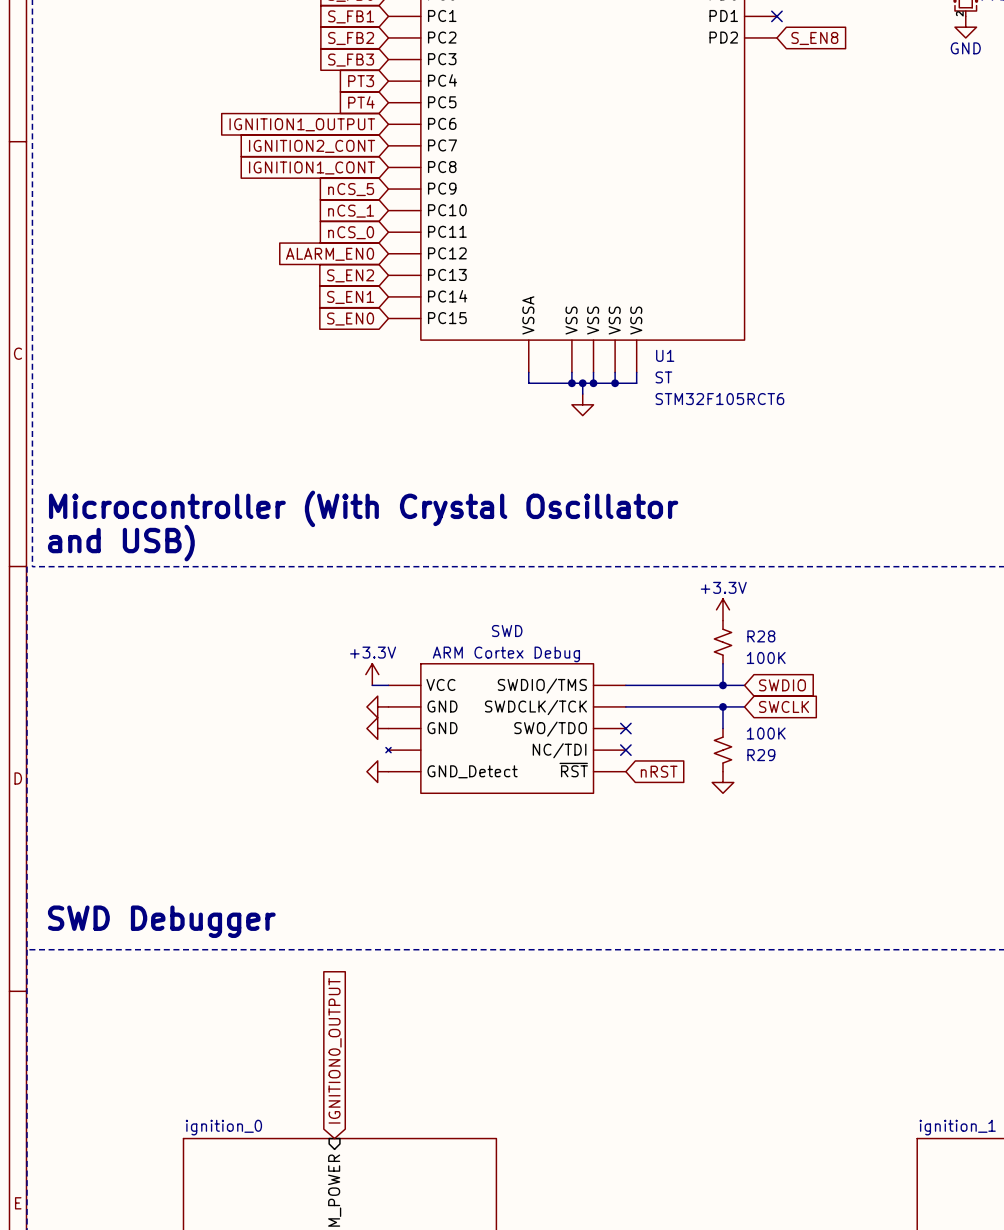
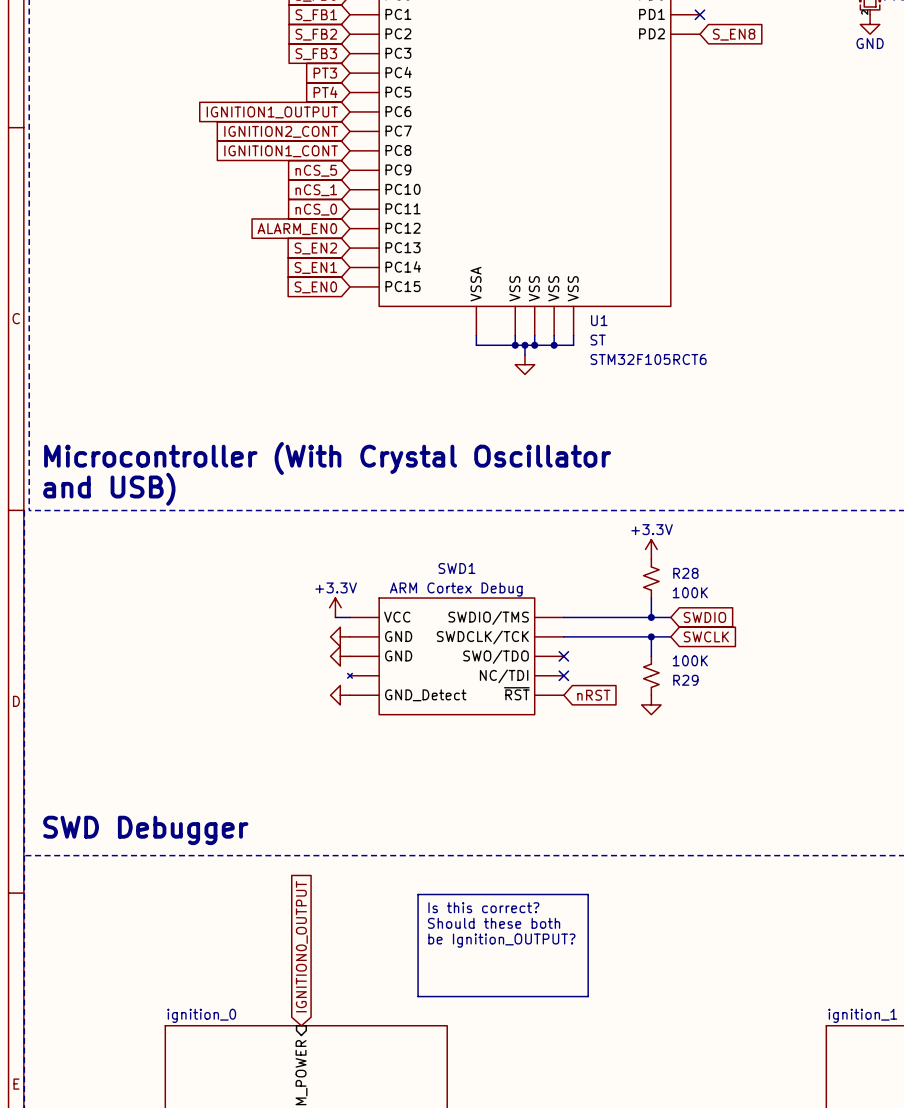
SWD name: SWD (507, 631) -> SWD1 (456, 568)
line: none -> (418, 894) (588, 894) (588, 996) (418, 996) (418, 894)
text: none -> Is this correct? (483, 907)
text: none -> Should these both (494, 923)
text: none -> be Ignition_OUTPUT? (501, 940)

